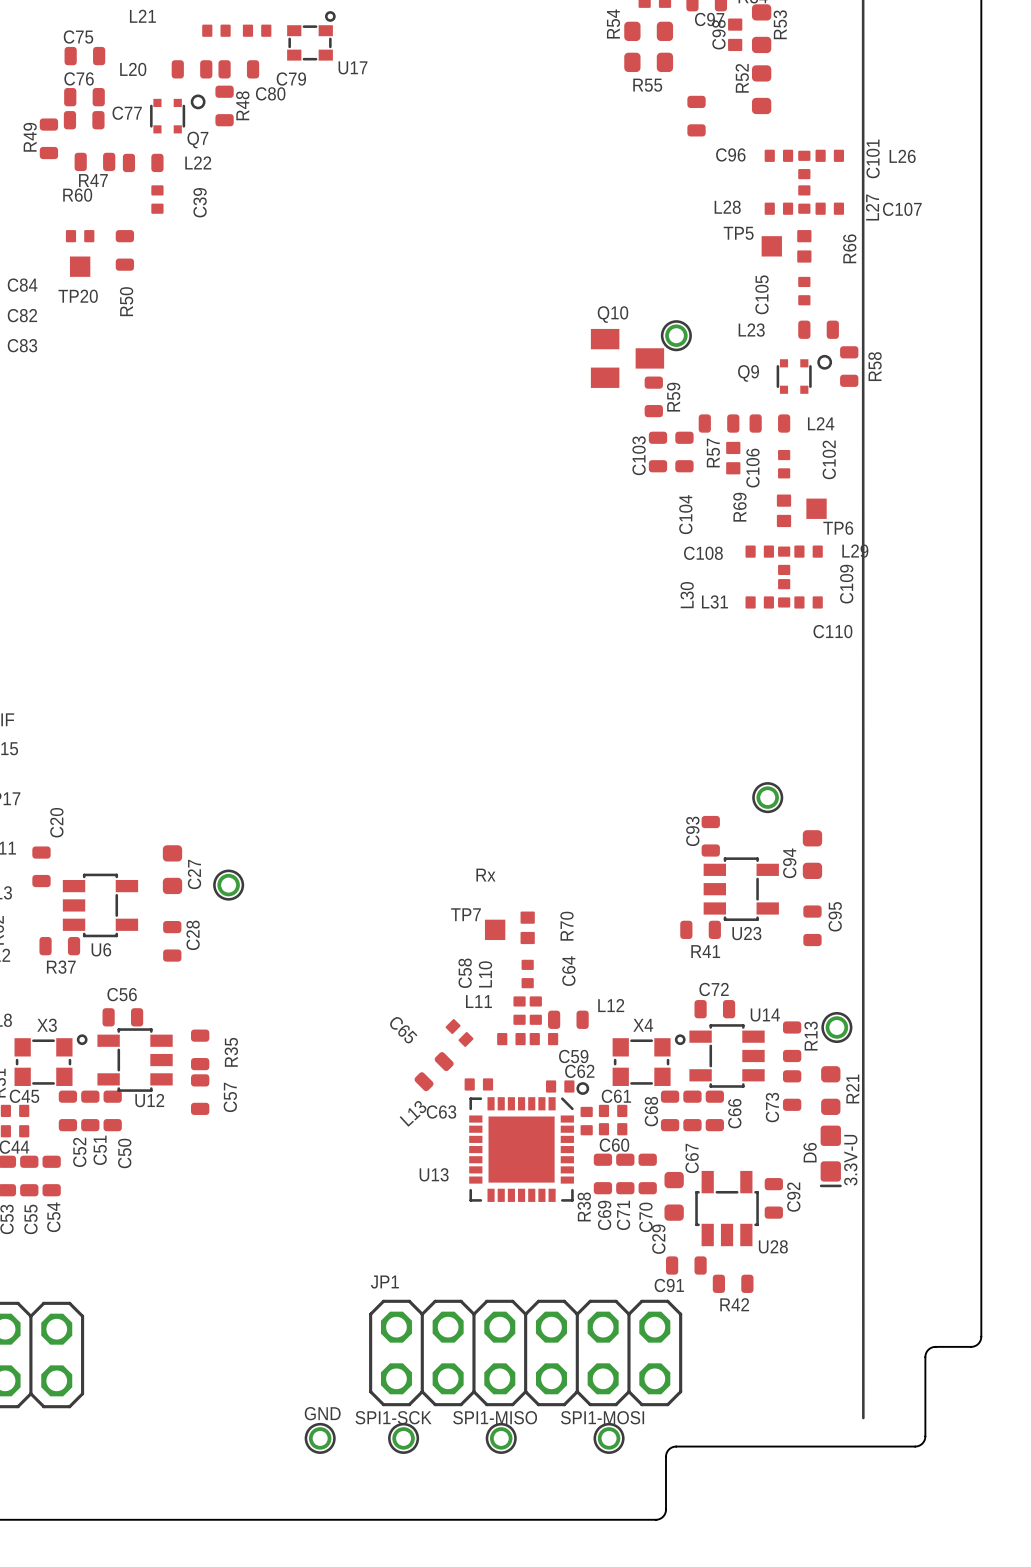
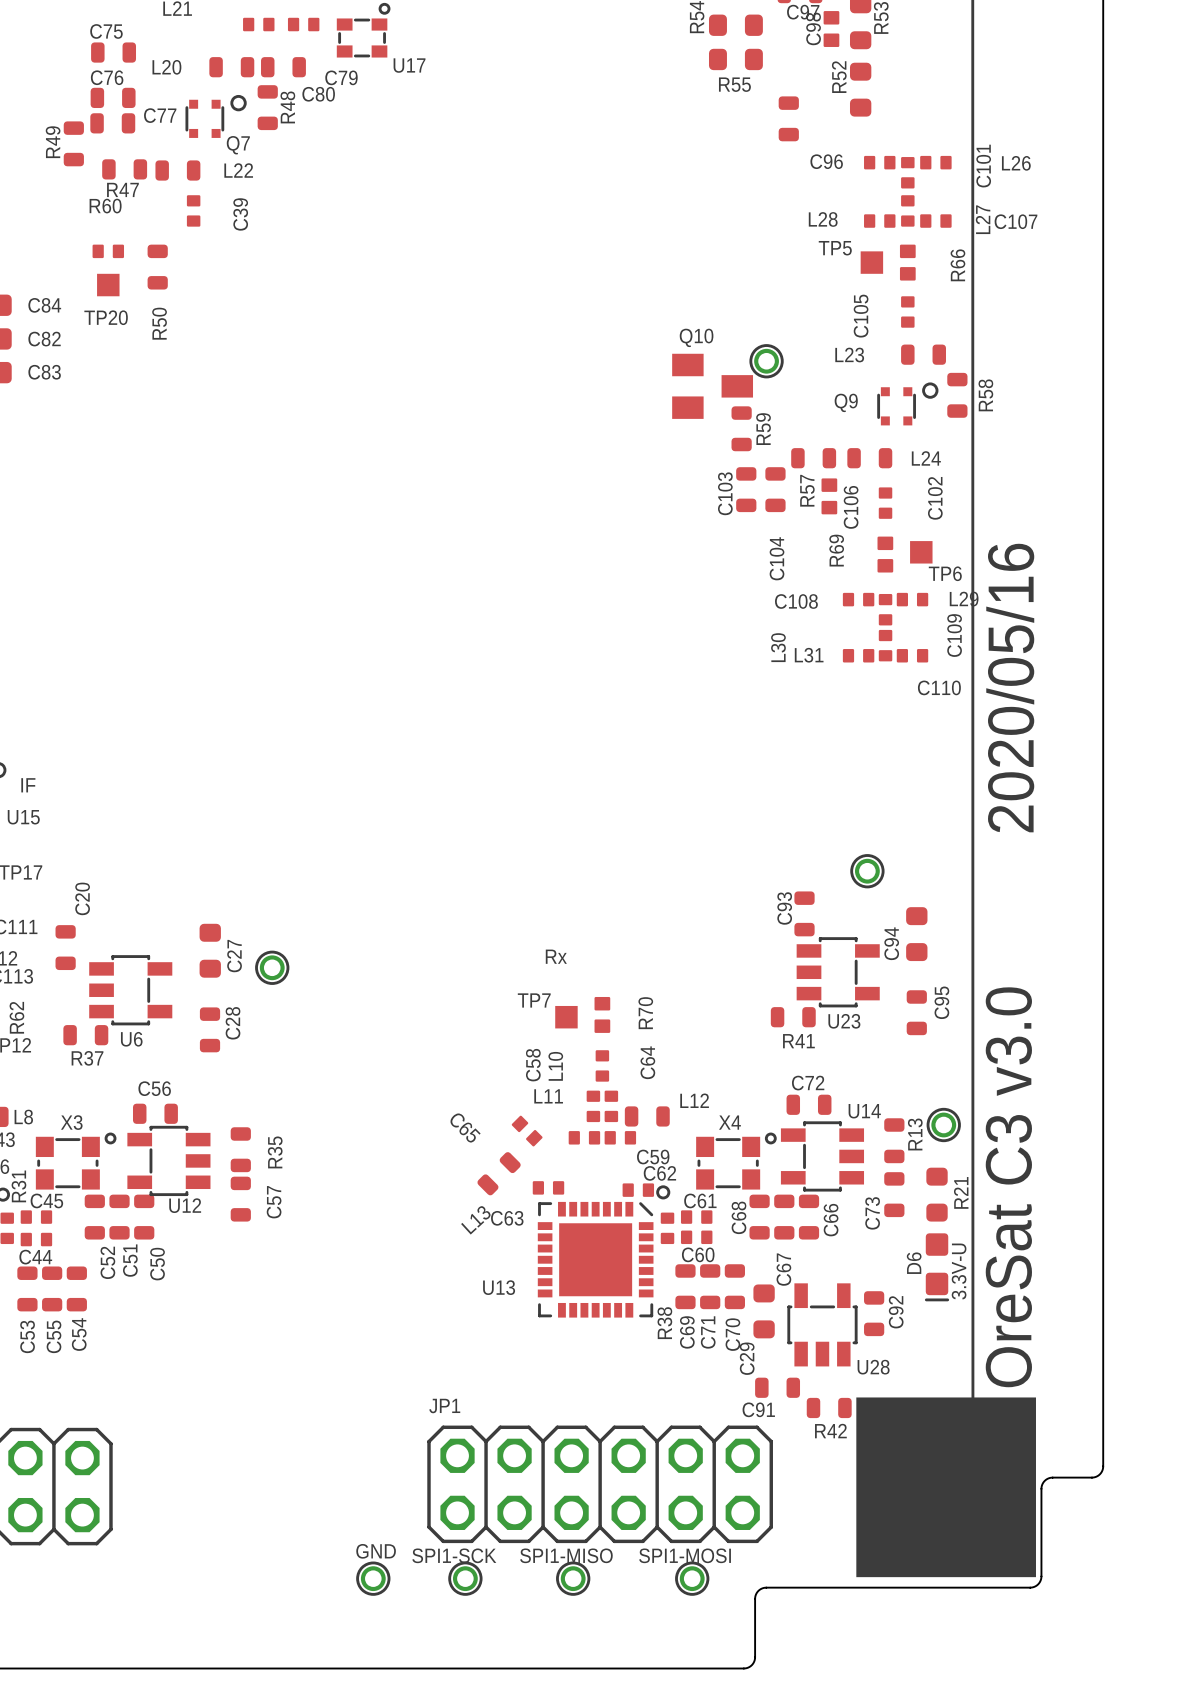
text: none -> 2020/05/16 (1010, 688)
text: none -> OreSat C3 v3.0 (1008, 1187)
drawing: none -> [856, 1397, 1036, 1578]

